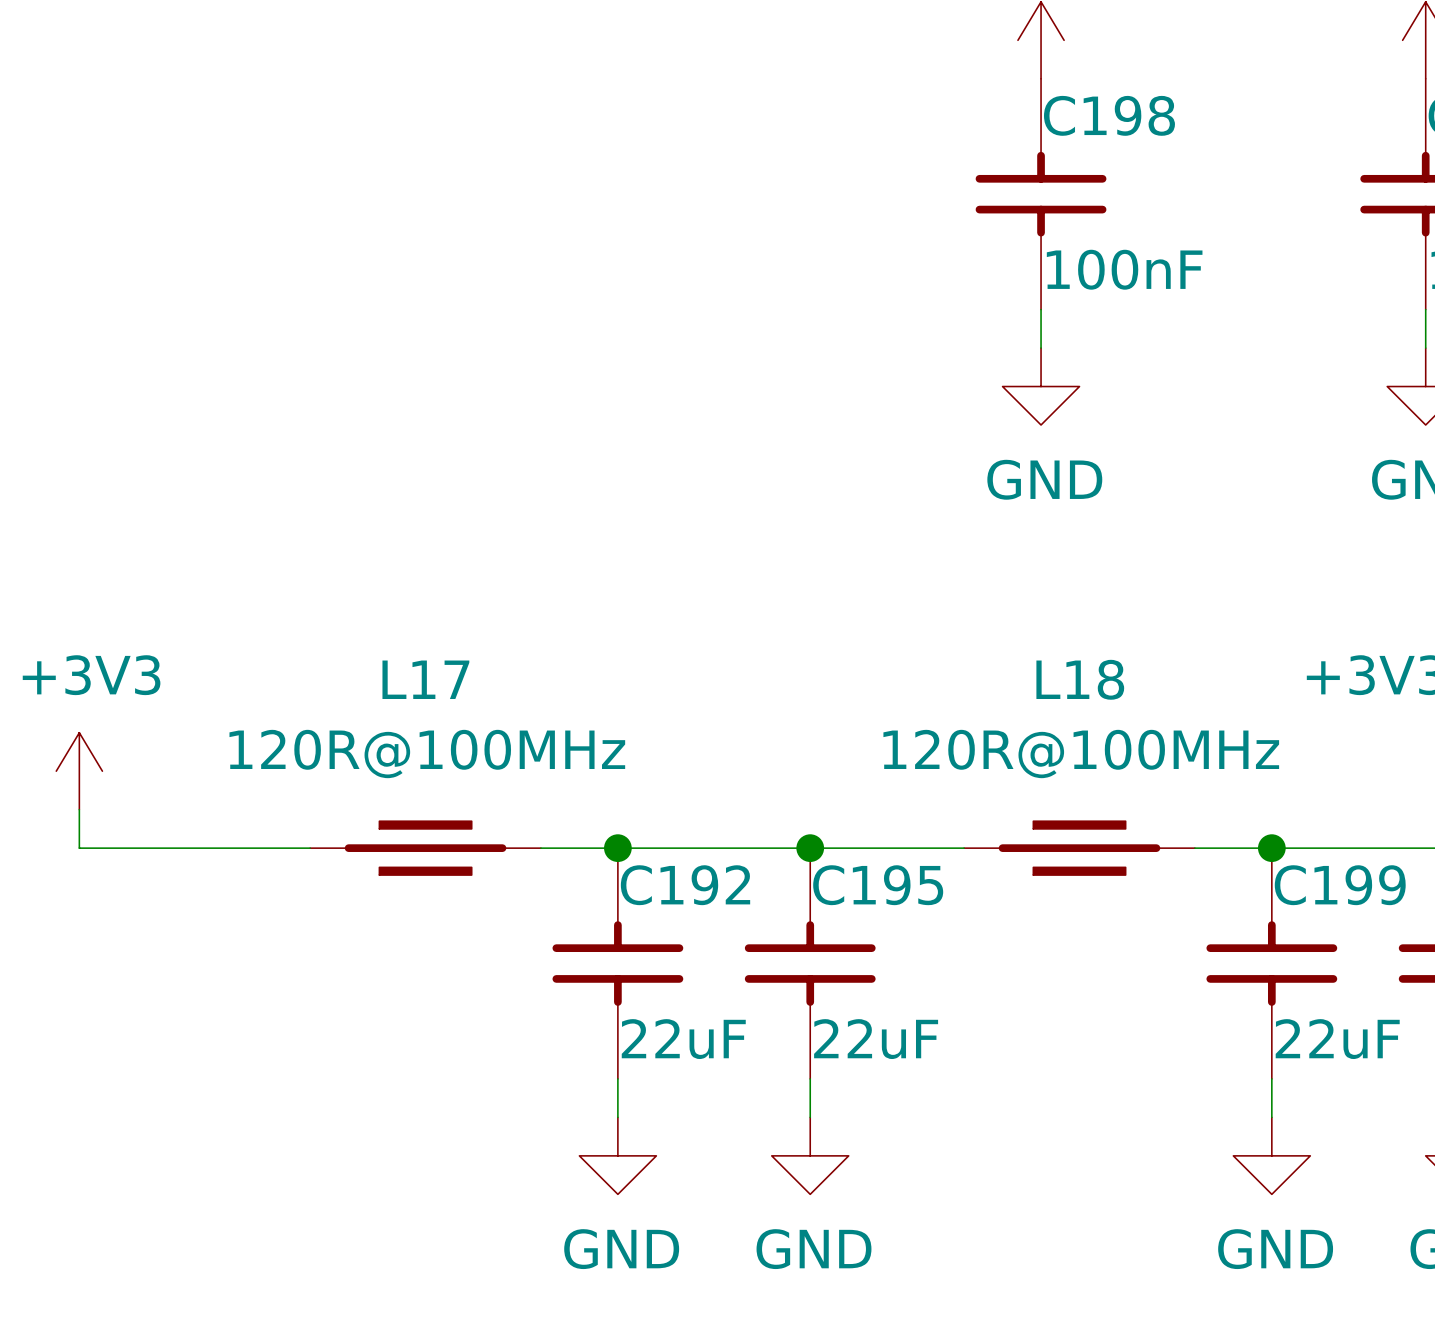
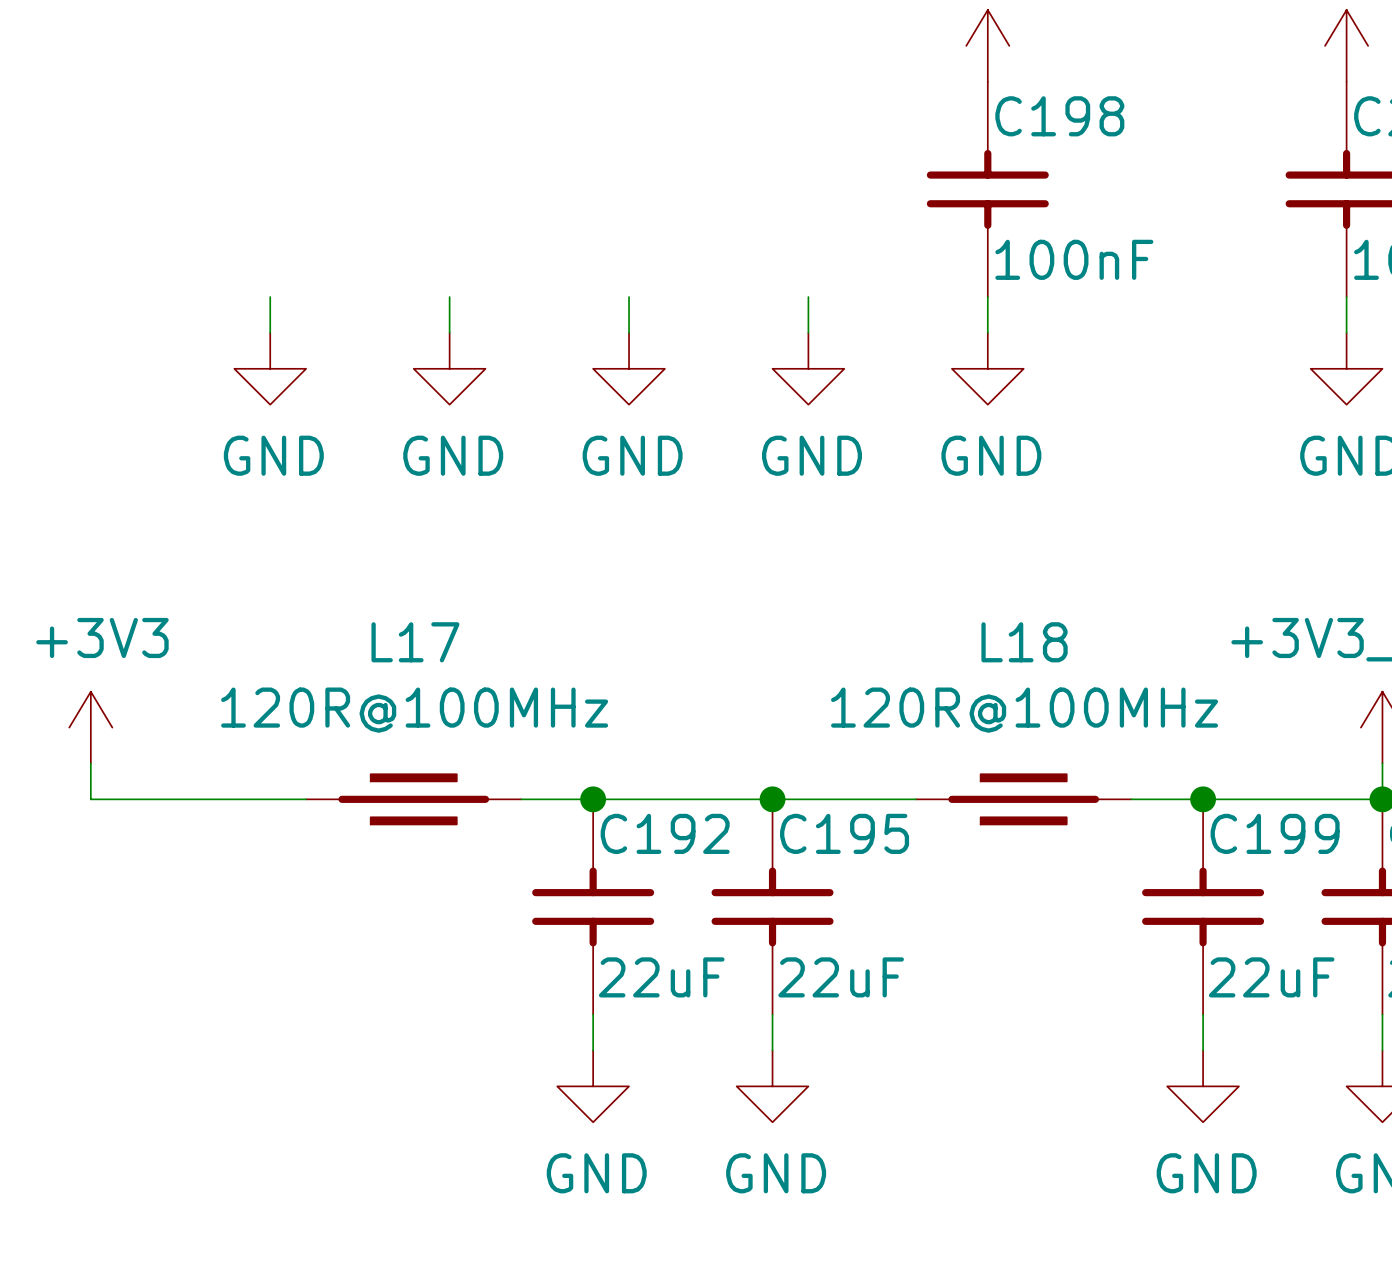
wire: none -> (270, 297) (270, 332)
wire: none -> (449, 297) (449, 332)
wire: none -> (629, 297) (629, 332)
wire: none -> (808, 297) (808, 332)
power symbol: none -> GND (270, 368)
power symbol: none -> GND (449, 368)
power symbol: none -> GND (629, 368)
power symbol: none -> GND (808, 368)

